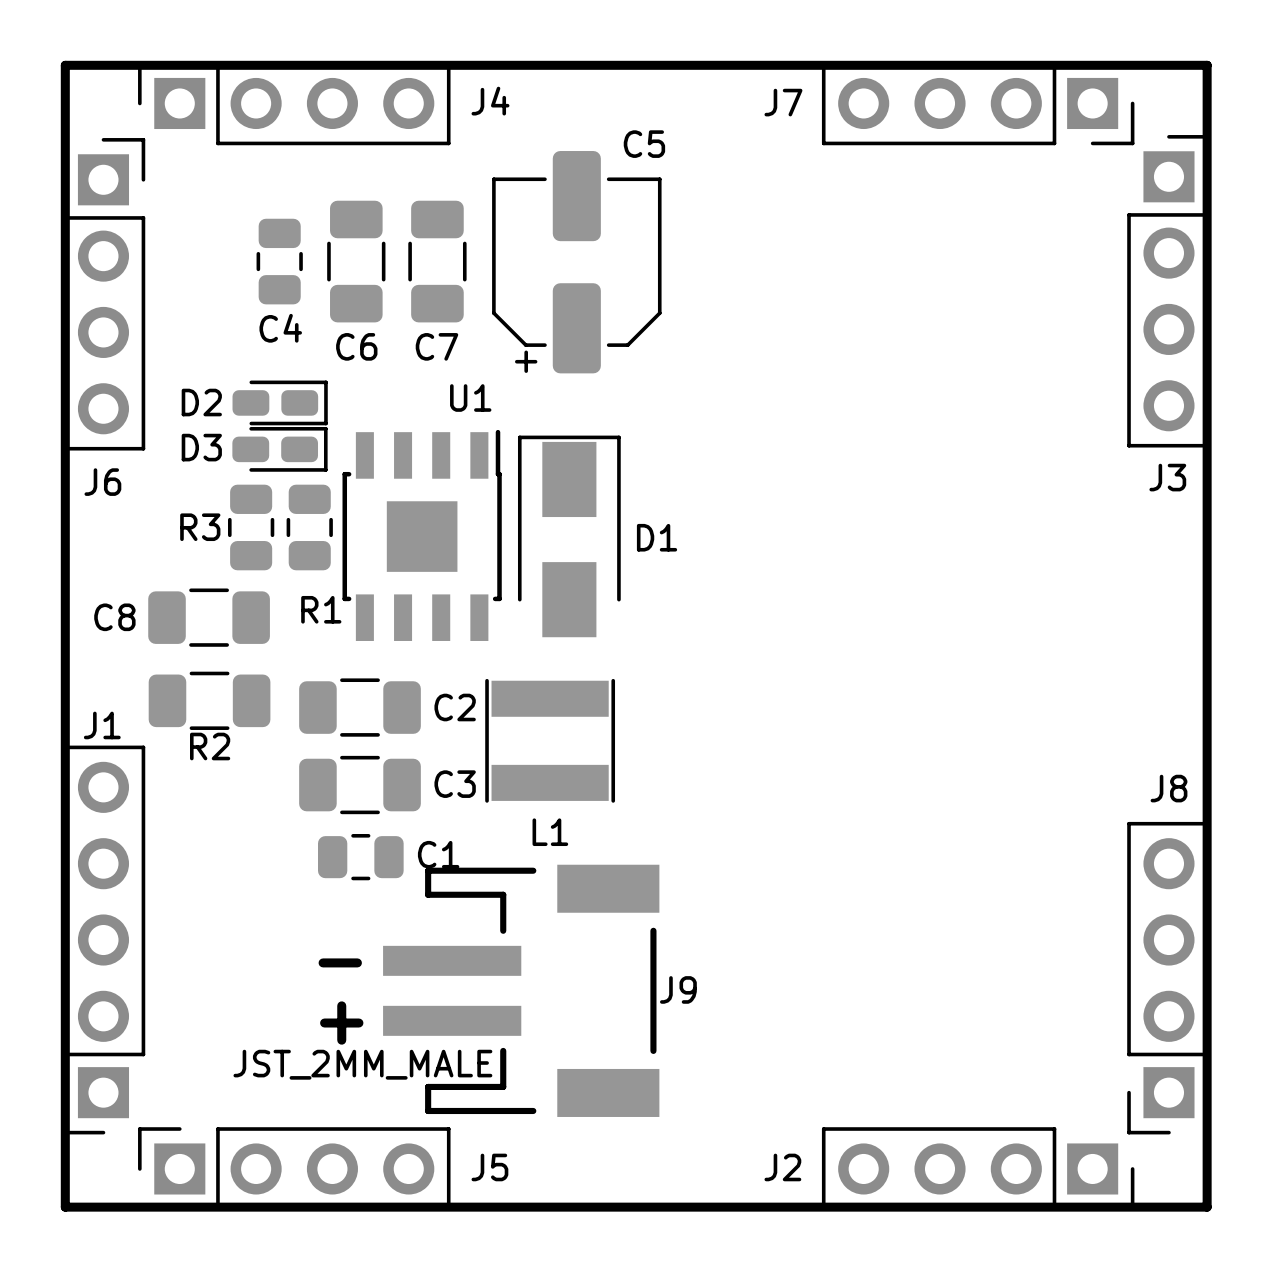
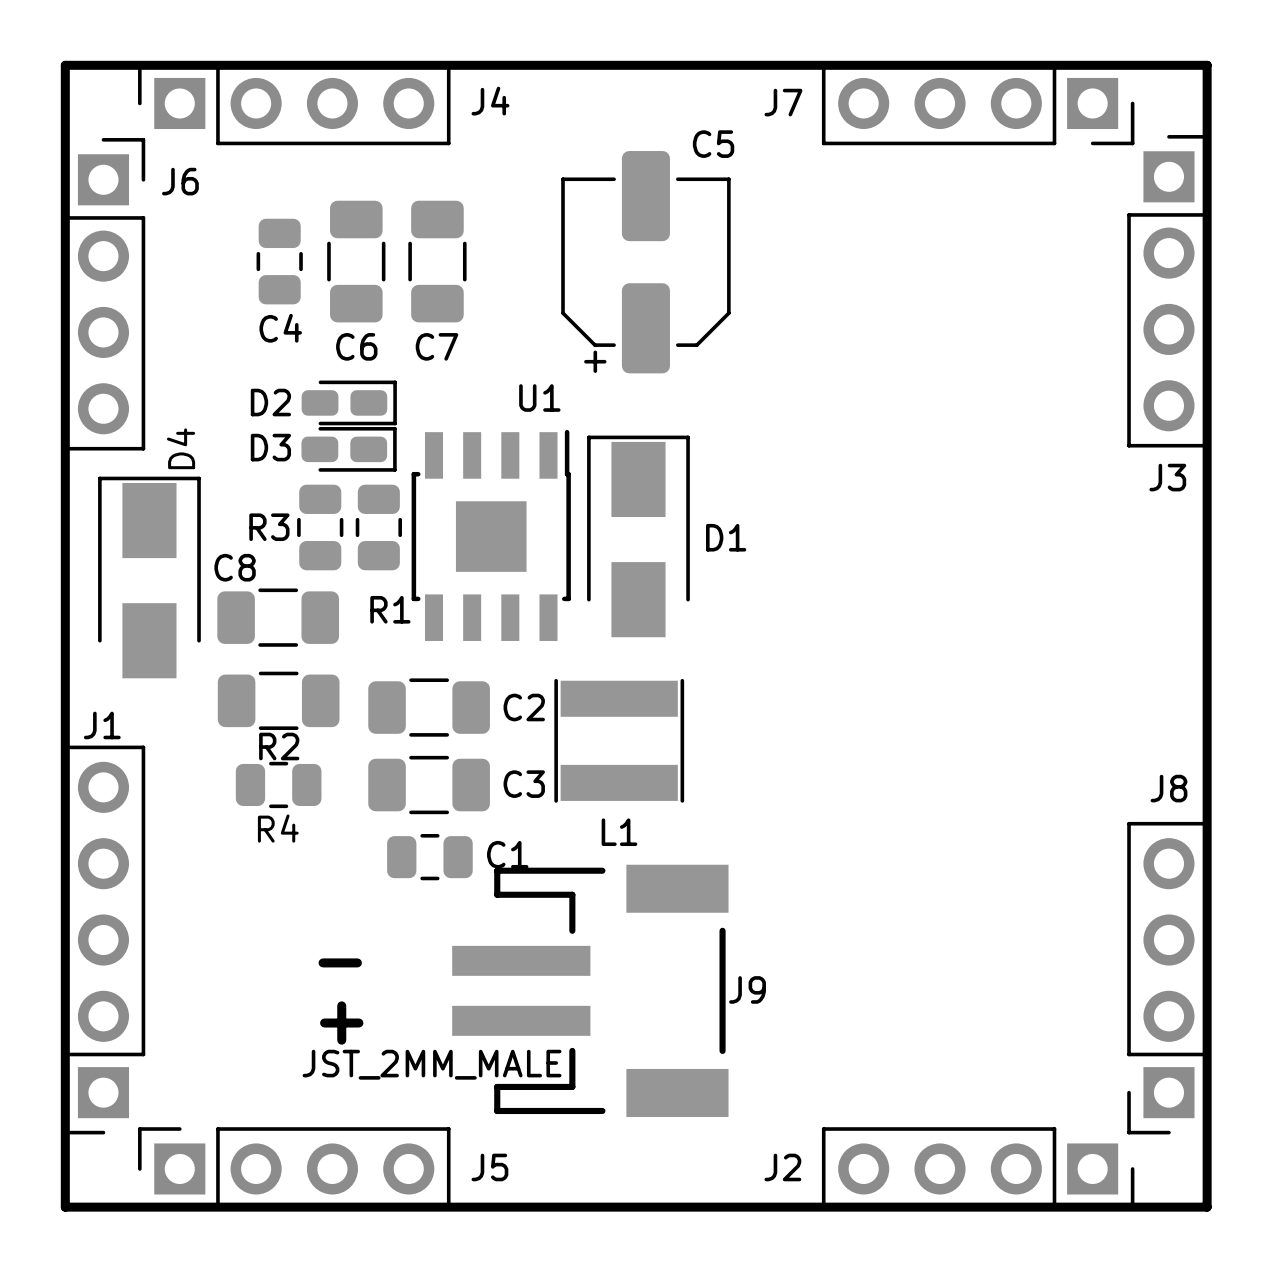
C5 position: (576, 262) -> (645, 262)
D2 position: (280, 402) -> (349, 402)
D3 position: (279, 449) -> (349, 449)
J6 name position: J6 (102, 482) -> J6 (180, 181)
R3 position: (251, 527) -> (320, 527)
R1 position: (309, 527) -> (378, 527)
U1 position: (422, 535) -> (491, 535)
D1 position: (569, 536) -> (638, 536)
D4: none -> (149, 577)
C8 name position: C8 (114, 617) -> C8 (235, 567)
C8 position: (209, 617) -> (278, 617)
R2 position: (209, 700) -> (278, 700)
C2 position: (360, 707) -> (429, 707)
L1 position: (550, 740) -> (619, 740)
R4: none -> (278, 784)
C3 position: (360, 785) -> (429, 785)
C1 position: (360, 857) -> (429, 857)
J9 position: (521, 990) -> (590, 990)

